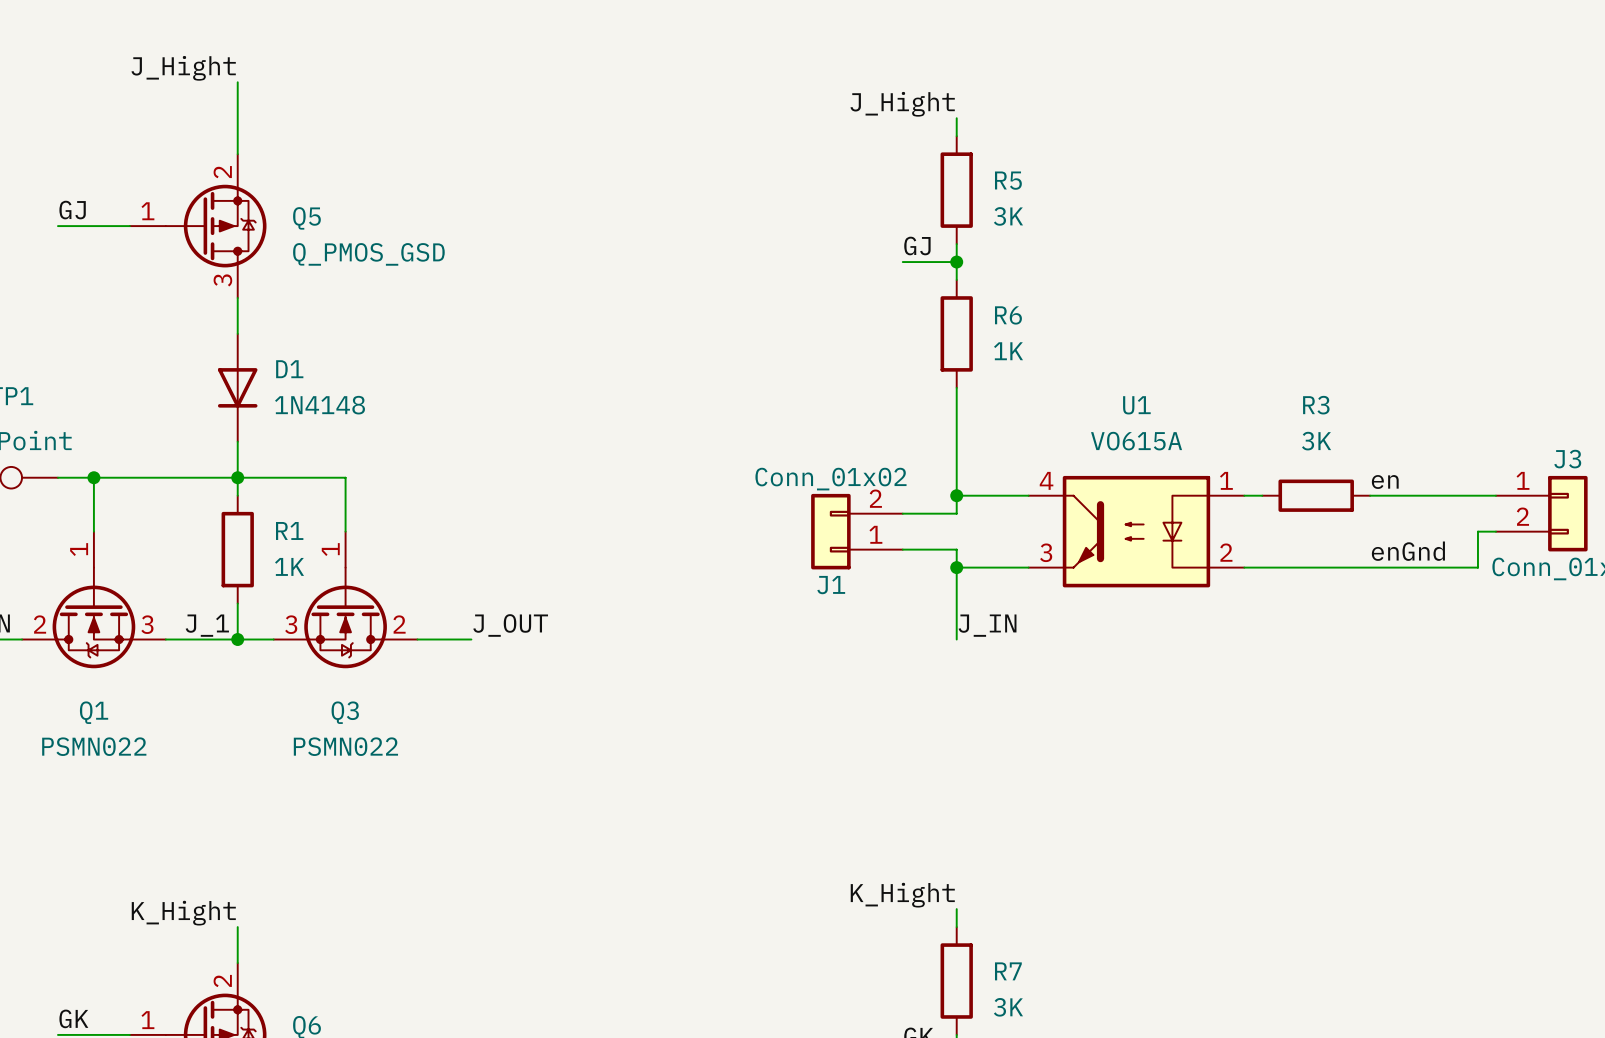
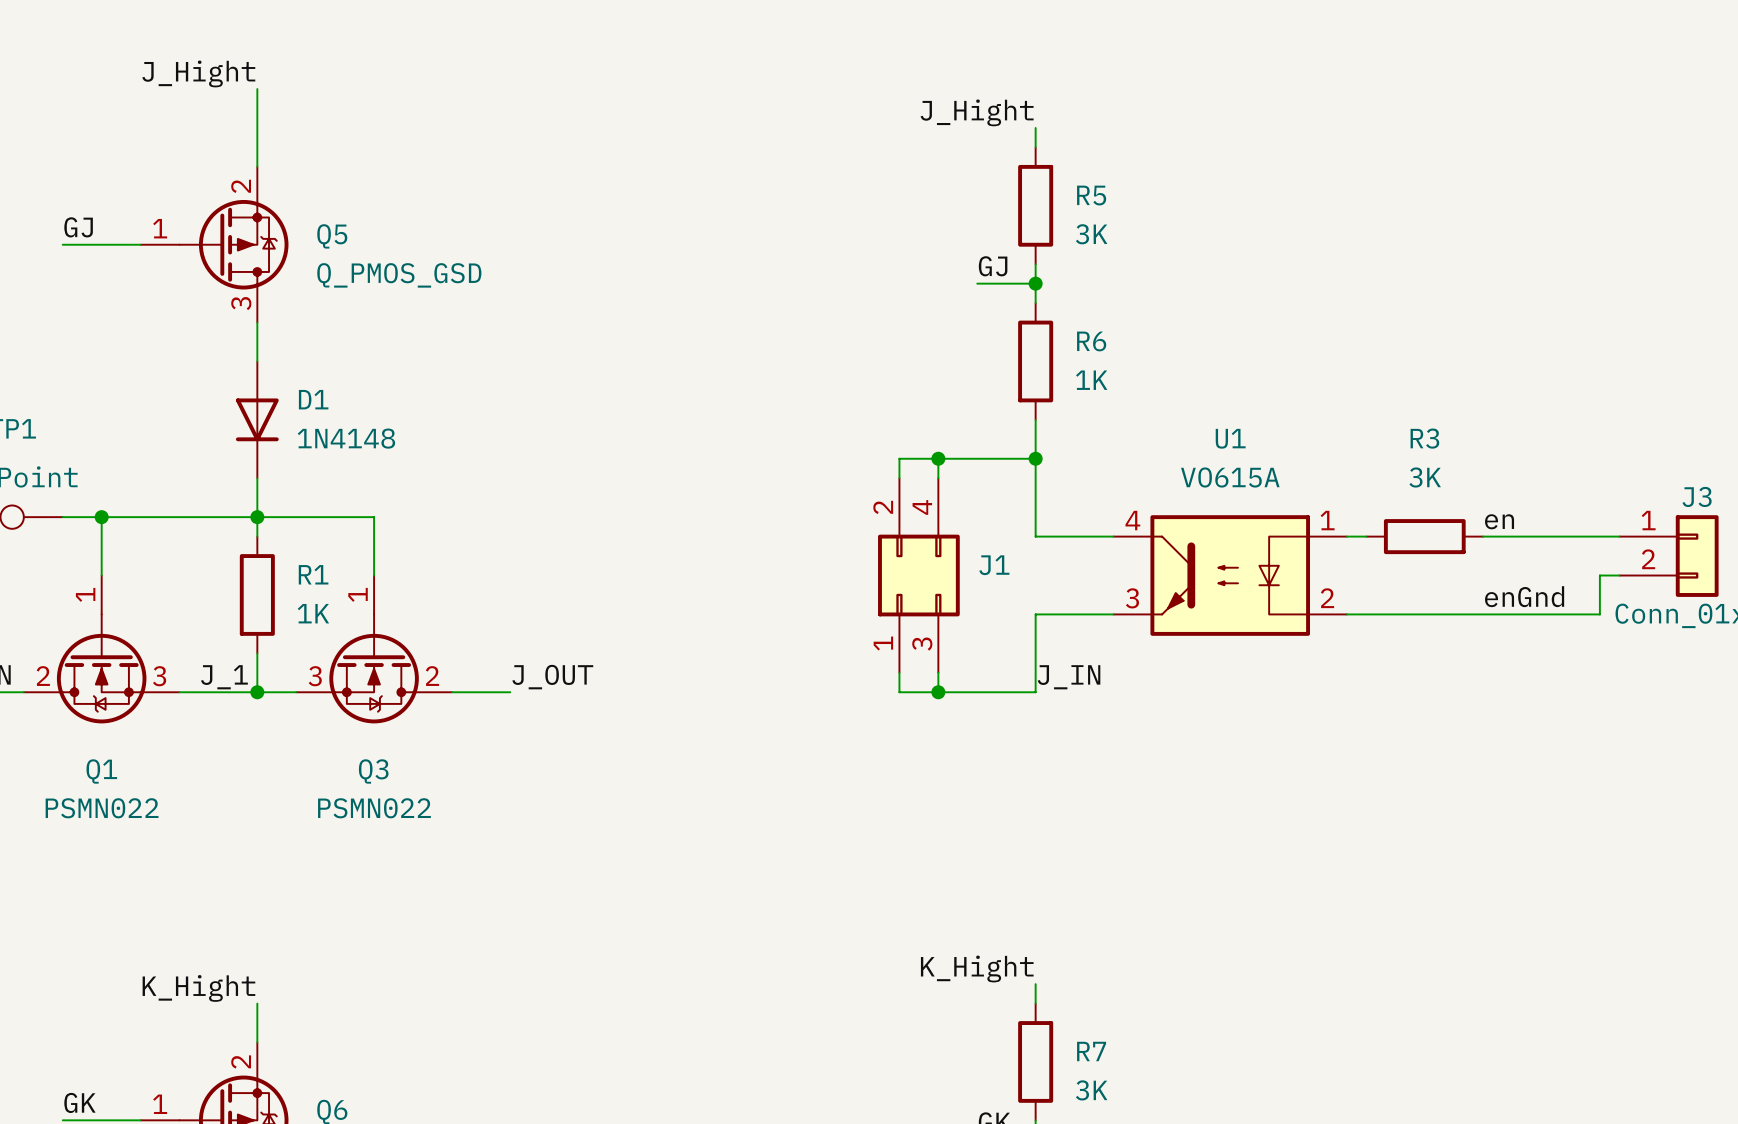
wire: none -> (938, 458) (938, 478)
junction: none -> (938, 458)
wire: none -> (1035, 458) (899, 458) (899, 478)
junction: none -> (1035, 458)
J1 value: Conn_01x02 (830, 479) -> none
J1 symbol: [811, 493, 903, 570] -> [878, 478, 960, 673]
wire: (956, 495) (956, 513) (902, 513) -> none
junction: (956, 495) -> none
wire: (902, 549) (956, 549) (956, 567) -> none
junction: (956, 567) -> none
J1 name position: J1 (831, 585) -> J1 (994, 565)
wire: none -> (899, 672) (899, 692) (1035, 692)
wire: none -> (938, 672) (938, 692)
junction: none -> (938, 692)

